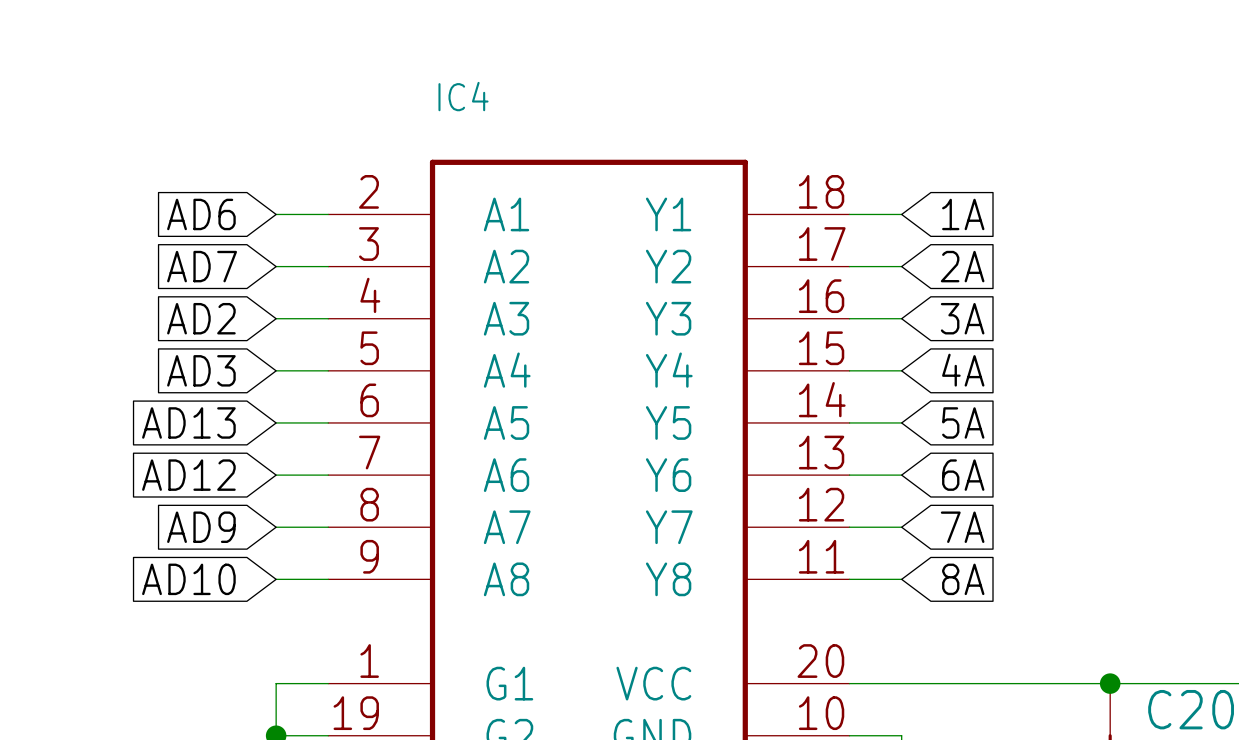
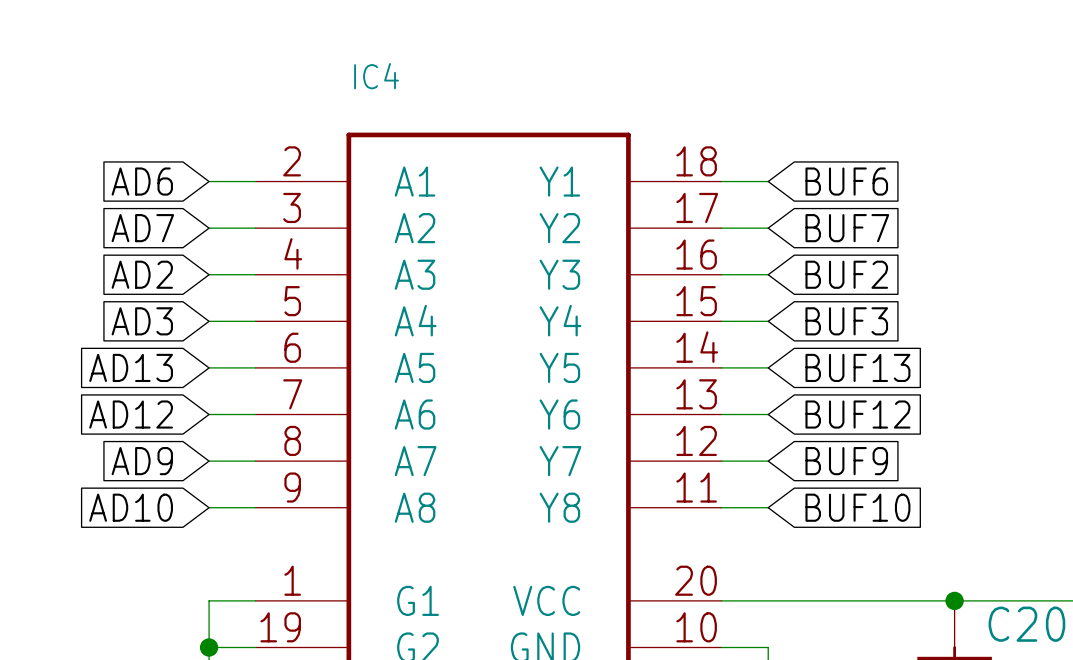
global label: 1A (963, 214) -> BUF6 (846, 181)
global label: 2A (962, 266) -> BUF7 (847, 228)
global label: 3A (962, 318) -> BUF2 (846, 274)
global label: 4A (963, 370) -> BUF3 (846, 321)
global label: 5A (963, 422) -> BUF13 (857, 367)
global label: 6A (963, 475) -> BUF12 (857, 414)
global label: 7A (962, 527) -> BUF9 (846, 461)
global label: 8A (963, 579) -> BUF10 (857, 507)

